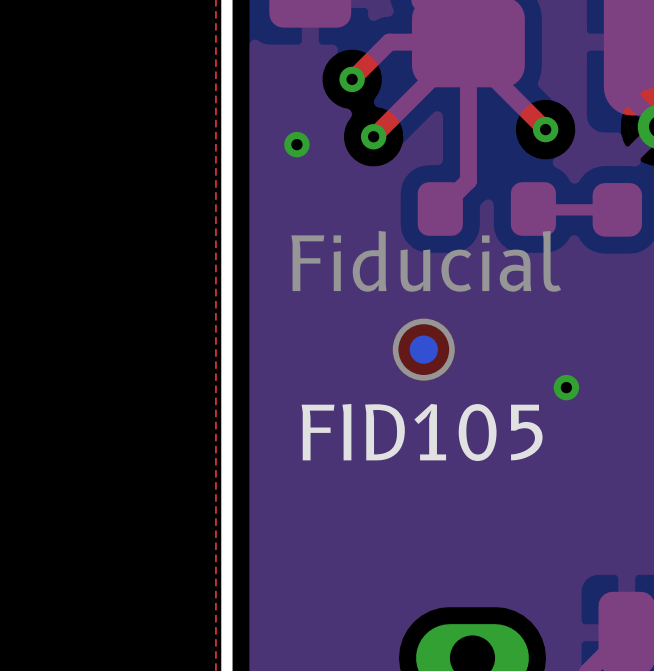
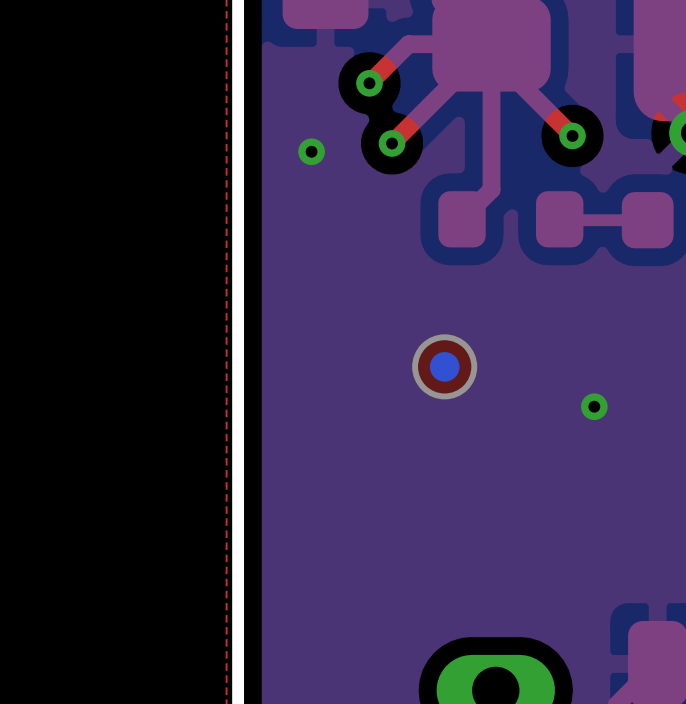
FID105 value: Fiducial (426, 261) -> none
FID105 name: FID105 (422, 432) -> none

